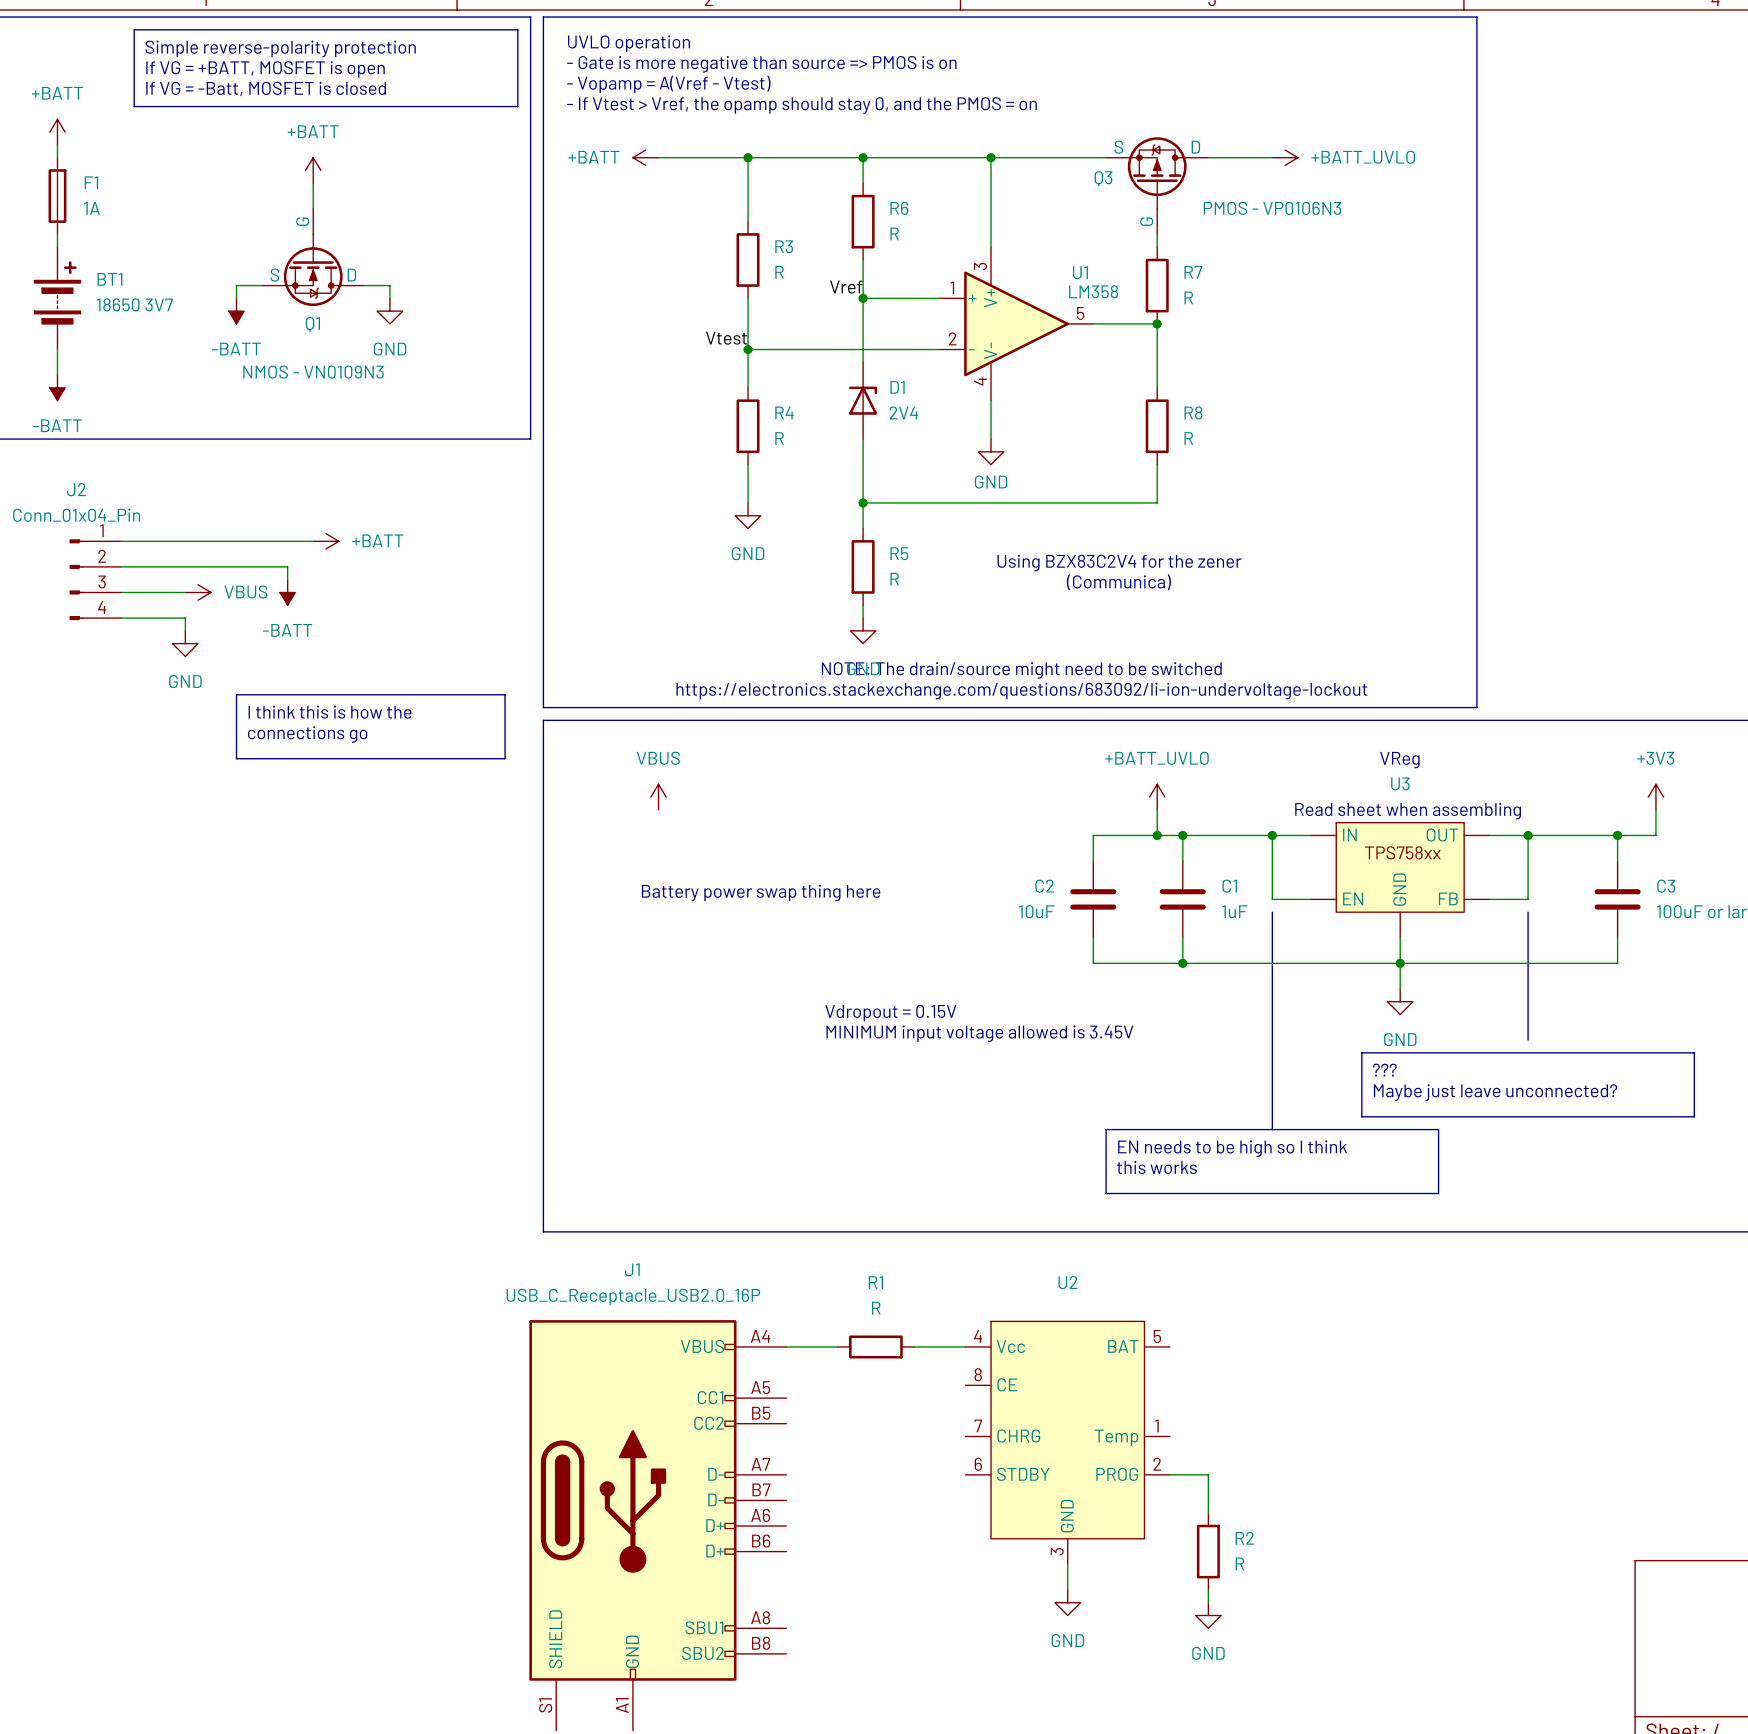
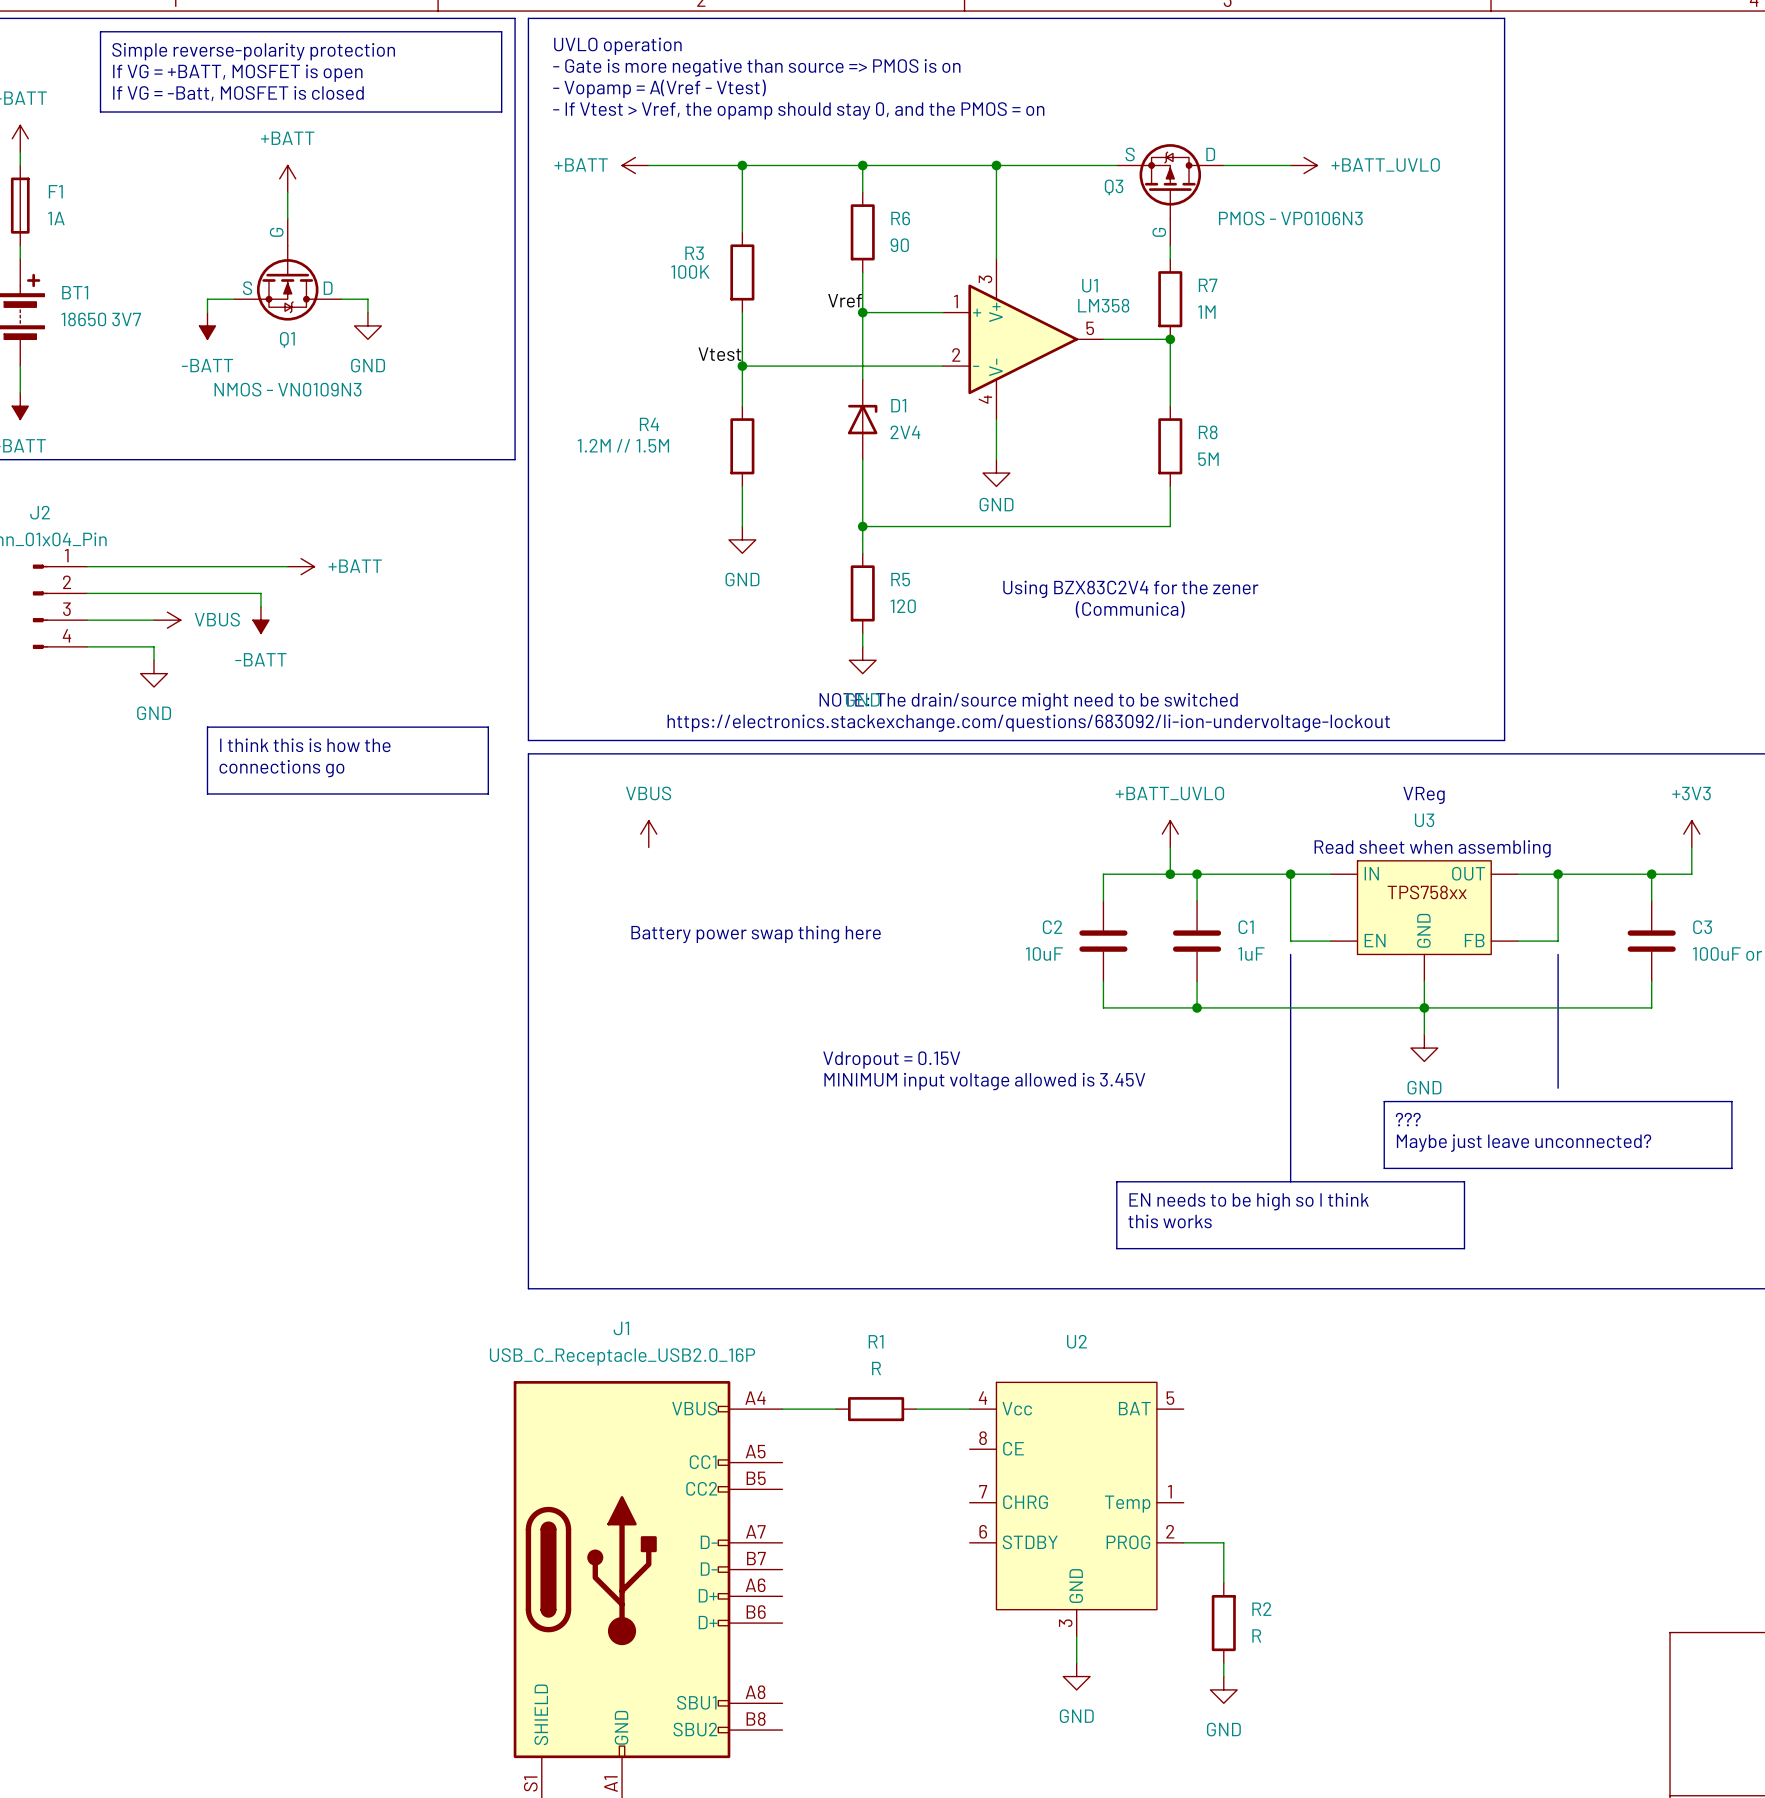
R6 value: R (894, 233) -> 90 (899, 245)
R3 name position: R3 (784, 246) -> R3 (694, 253)
R3 value: R (779, 272) -> 100K (690, 271)
R7 value: R (1188, 297) -> 1M (1206, 312)
R4 name position: R4 (784, 412) -> R4 (649, 424)
R4 value: R (779, 438) -> 1.2M // 1.5M (623, 445)
R8 value: R (1188, 438) -> 5M (1208, 459)
R5 value: R (894, 579) -> 120 (903, 606)

